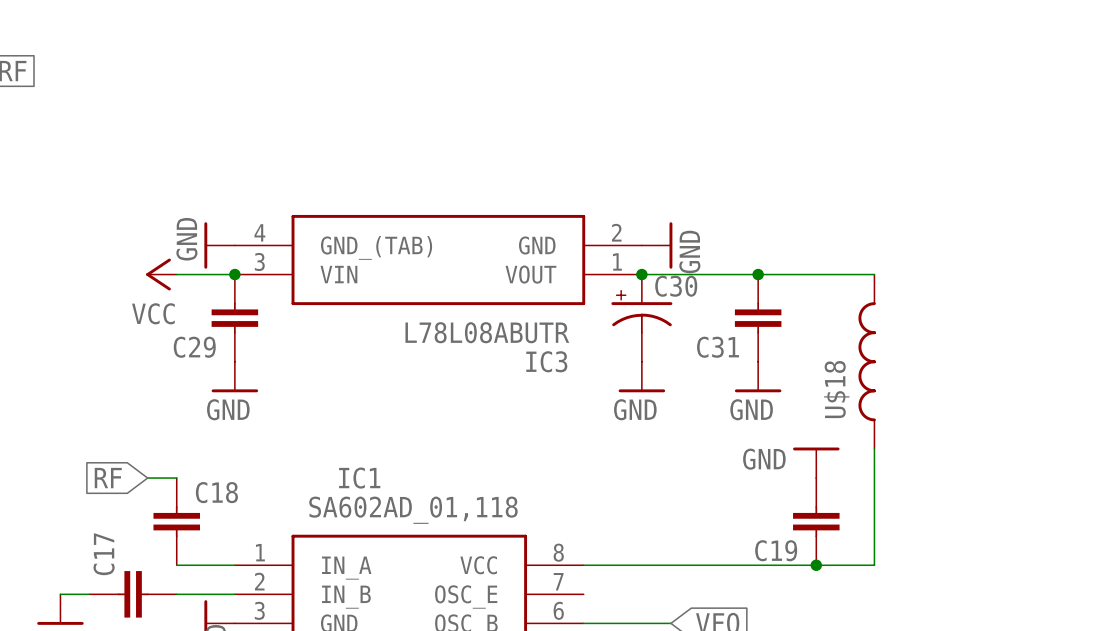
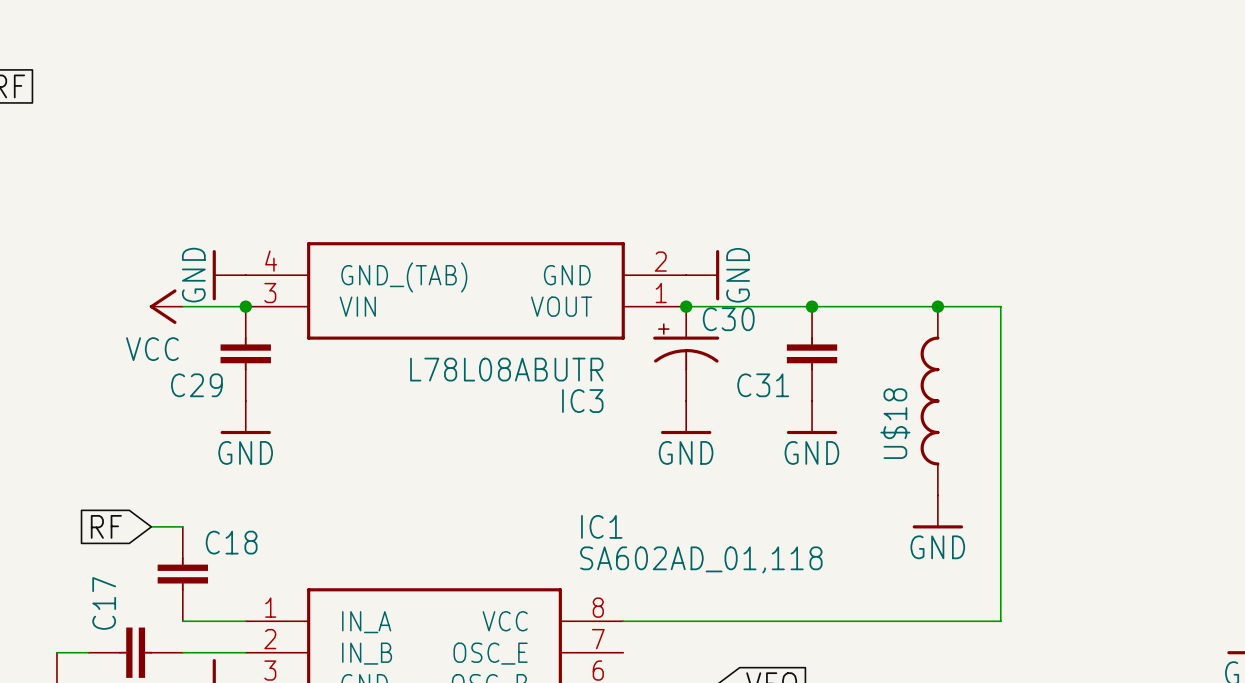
junction: none -> (937, 306)
power symbol rotation: 0° (816, 448) -> 180° (937, 526)
wire: (874, 448) (874, 565) -> (937, 306) (1000, 306) (1000, 621) (937, 621)
power symbol text position: GND (764, 459) -> GND (937, 547)
power symbol position: GND (816, 462) -> GND (937, 511)
IC1 name position: IC1 (359, 478) -> IC1 (601, 526)
IC1 value position: SA602AD_01,118 (413, 510) -> SA602AD_01,118 (701, 559)
C19: (816, 521) -> none
junction: (816, 565) -> none

